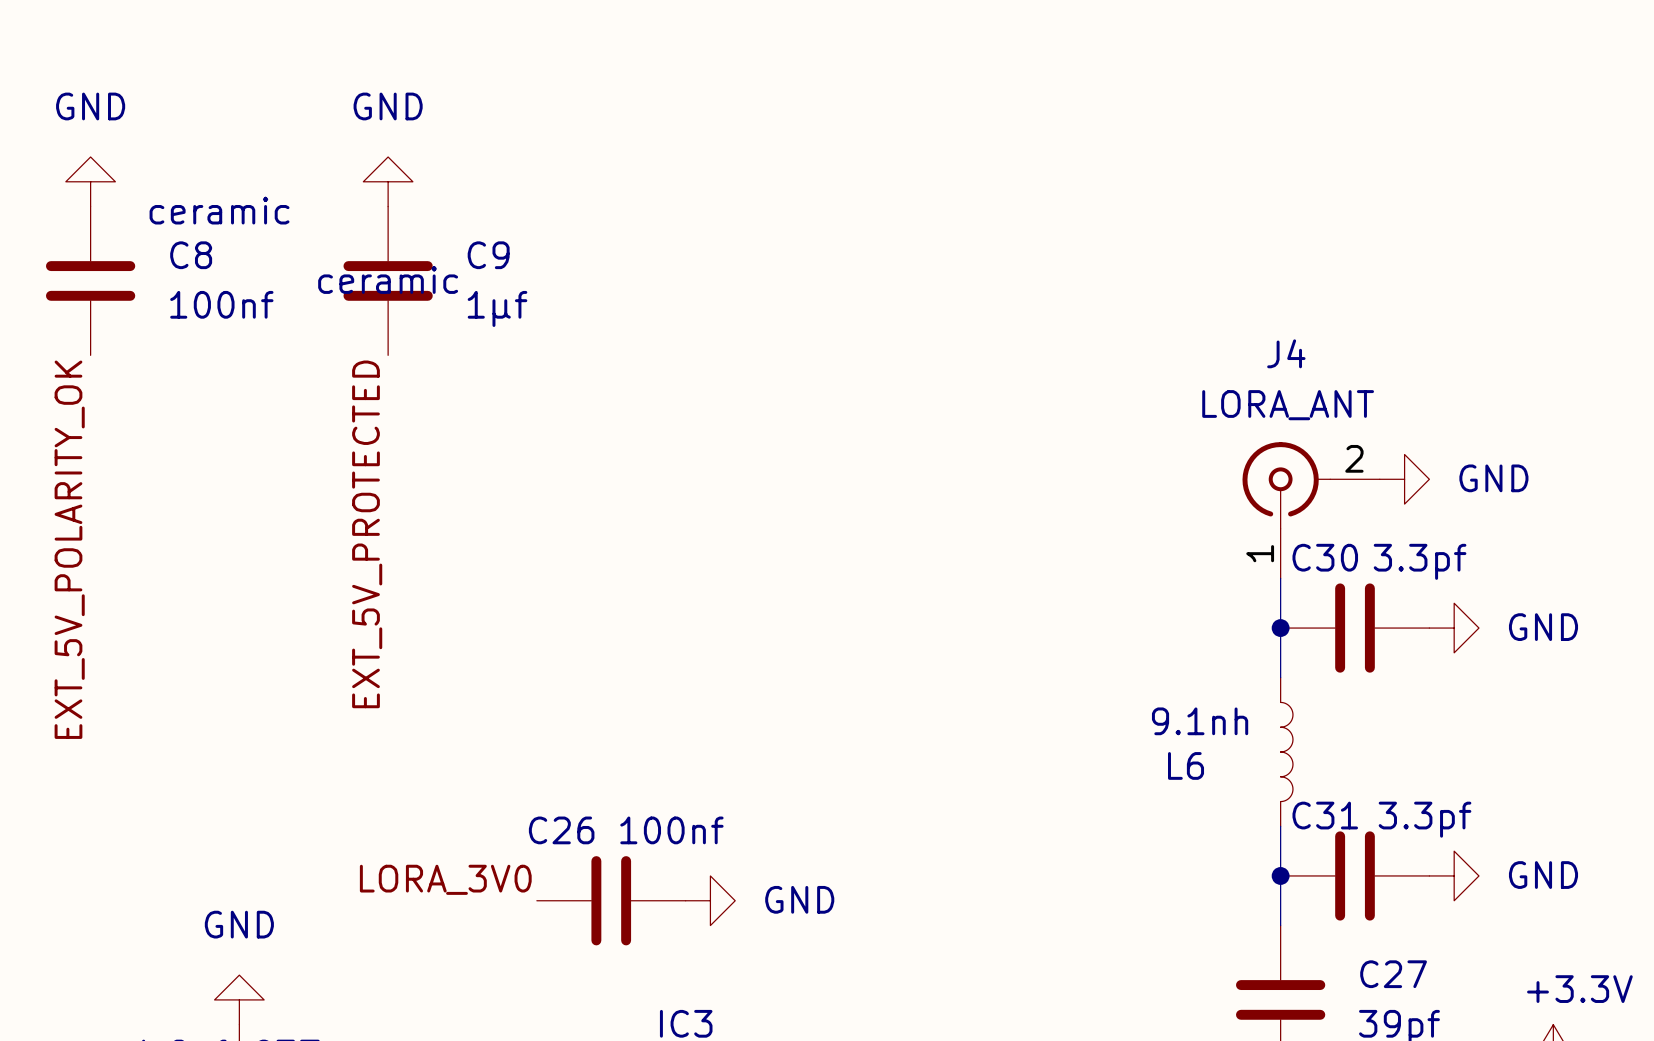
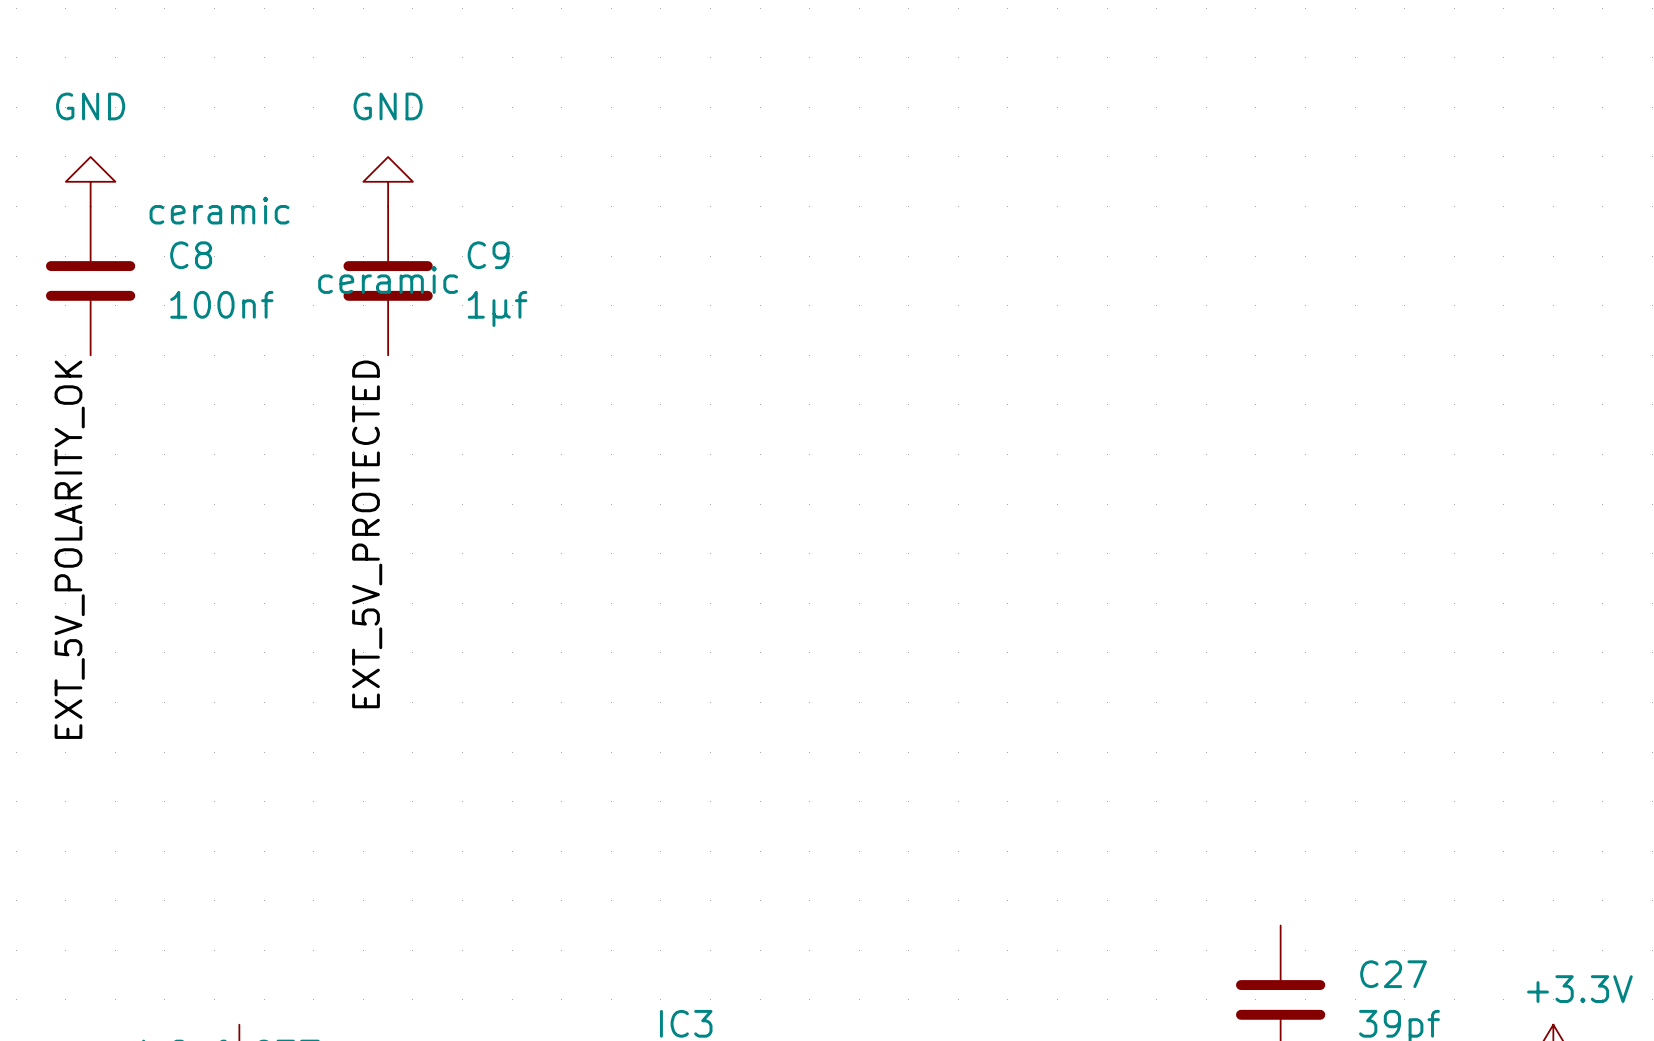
power symbol: GND (1404, 479) -> none
J4: LORA_ANT (1311, 510) -> none
wire: (1280, 578) (1280, 677) -> none
junction: (1280, 628) -> none
C30: 3.3pf (1355, 628) -> none
power symbol: GND (1454, 628) -> none
L6: 9.1nh (1286, 752) -> none
wire: (1280, 826) (1280, 925) -> none
junction: (1280, 875) -> none
C31: 3.3pf (1355, 875) -> none
power symbol: GND (1454, 875) -> none
label: LORA_3V0 (445, 879) -> none
C26: 100nf (611, 900) -> none
power symbol: GND (710, 900) -> none
power symbol: GND (239, 999) -> none

